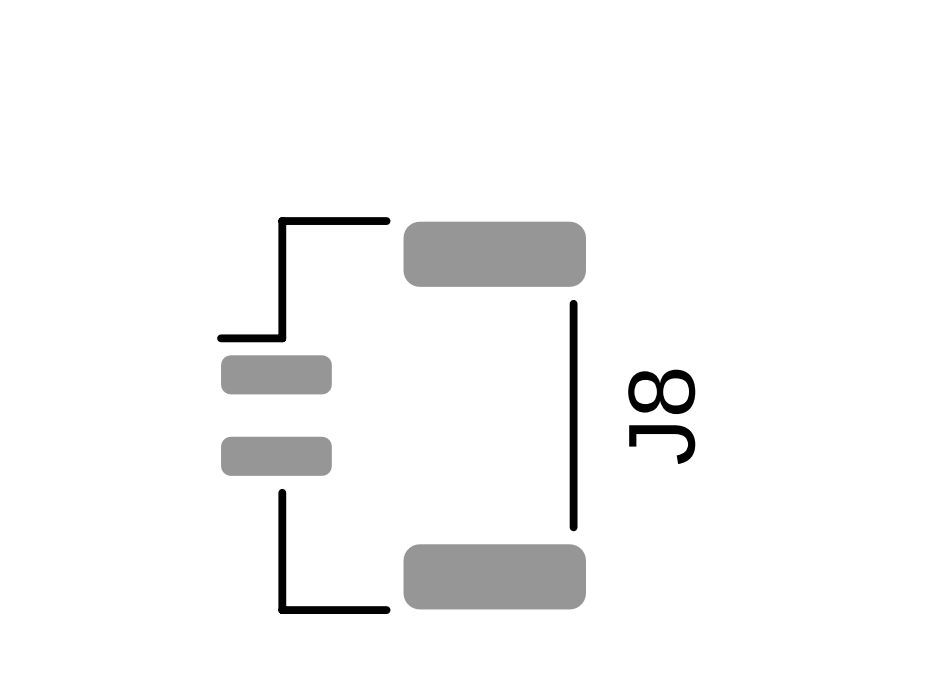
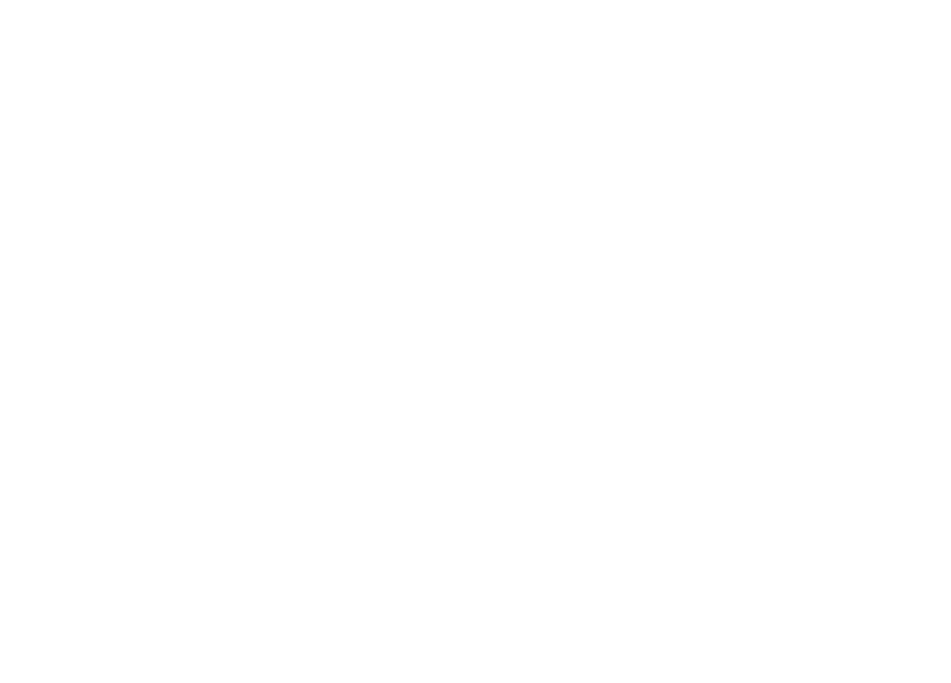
J8: (401, 415) -> none

